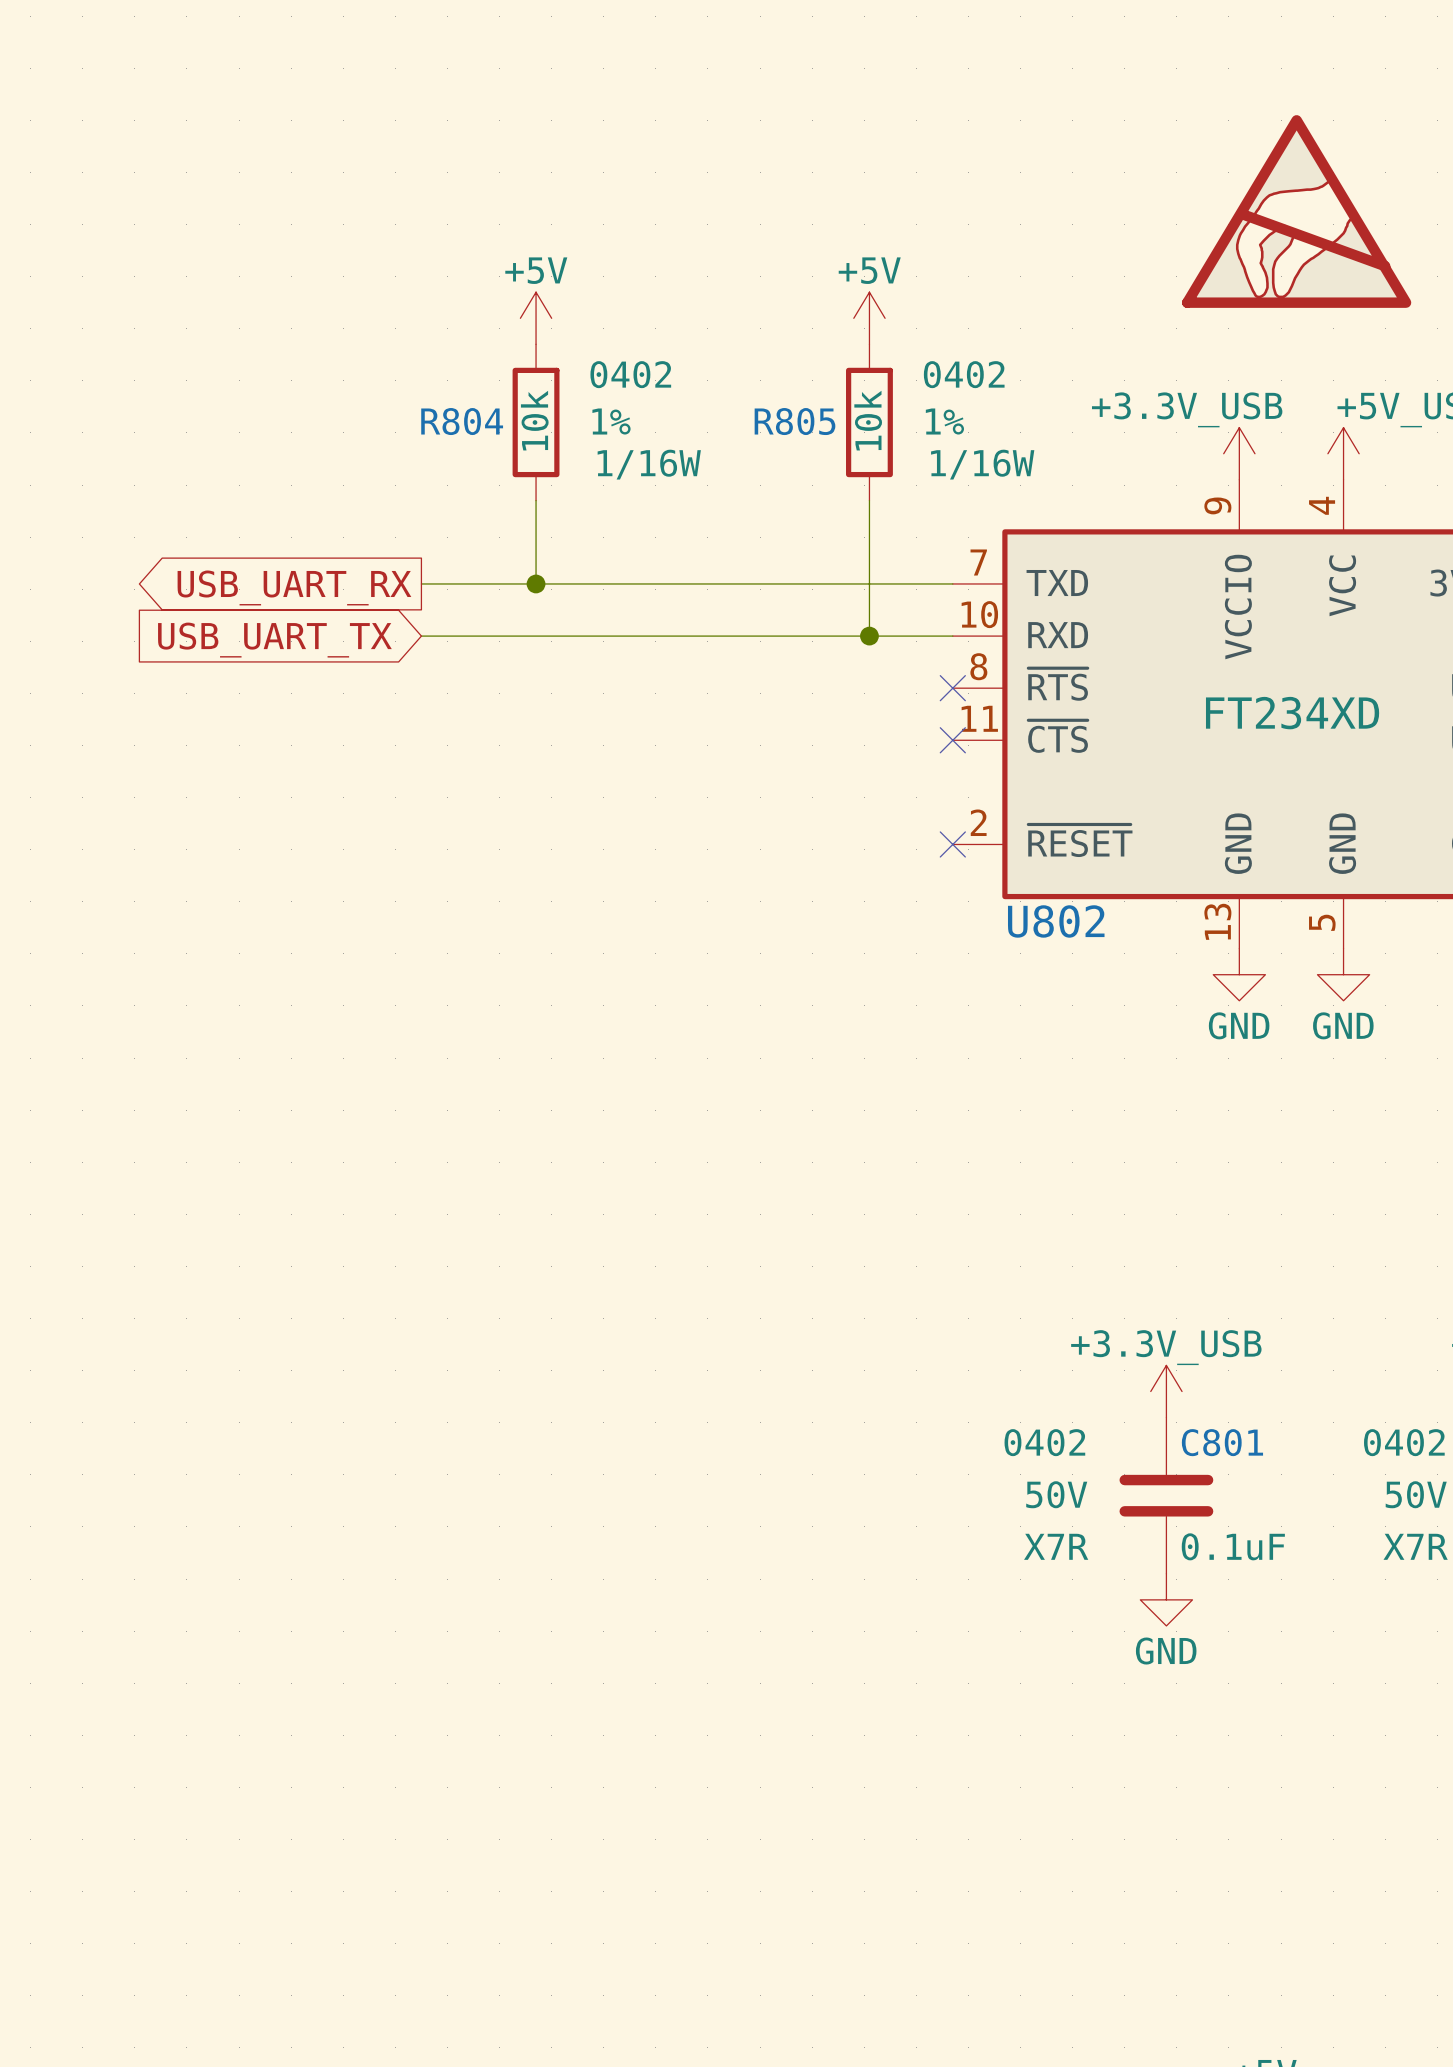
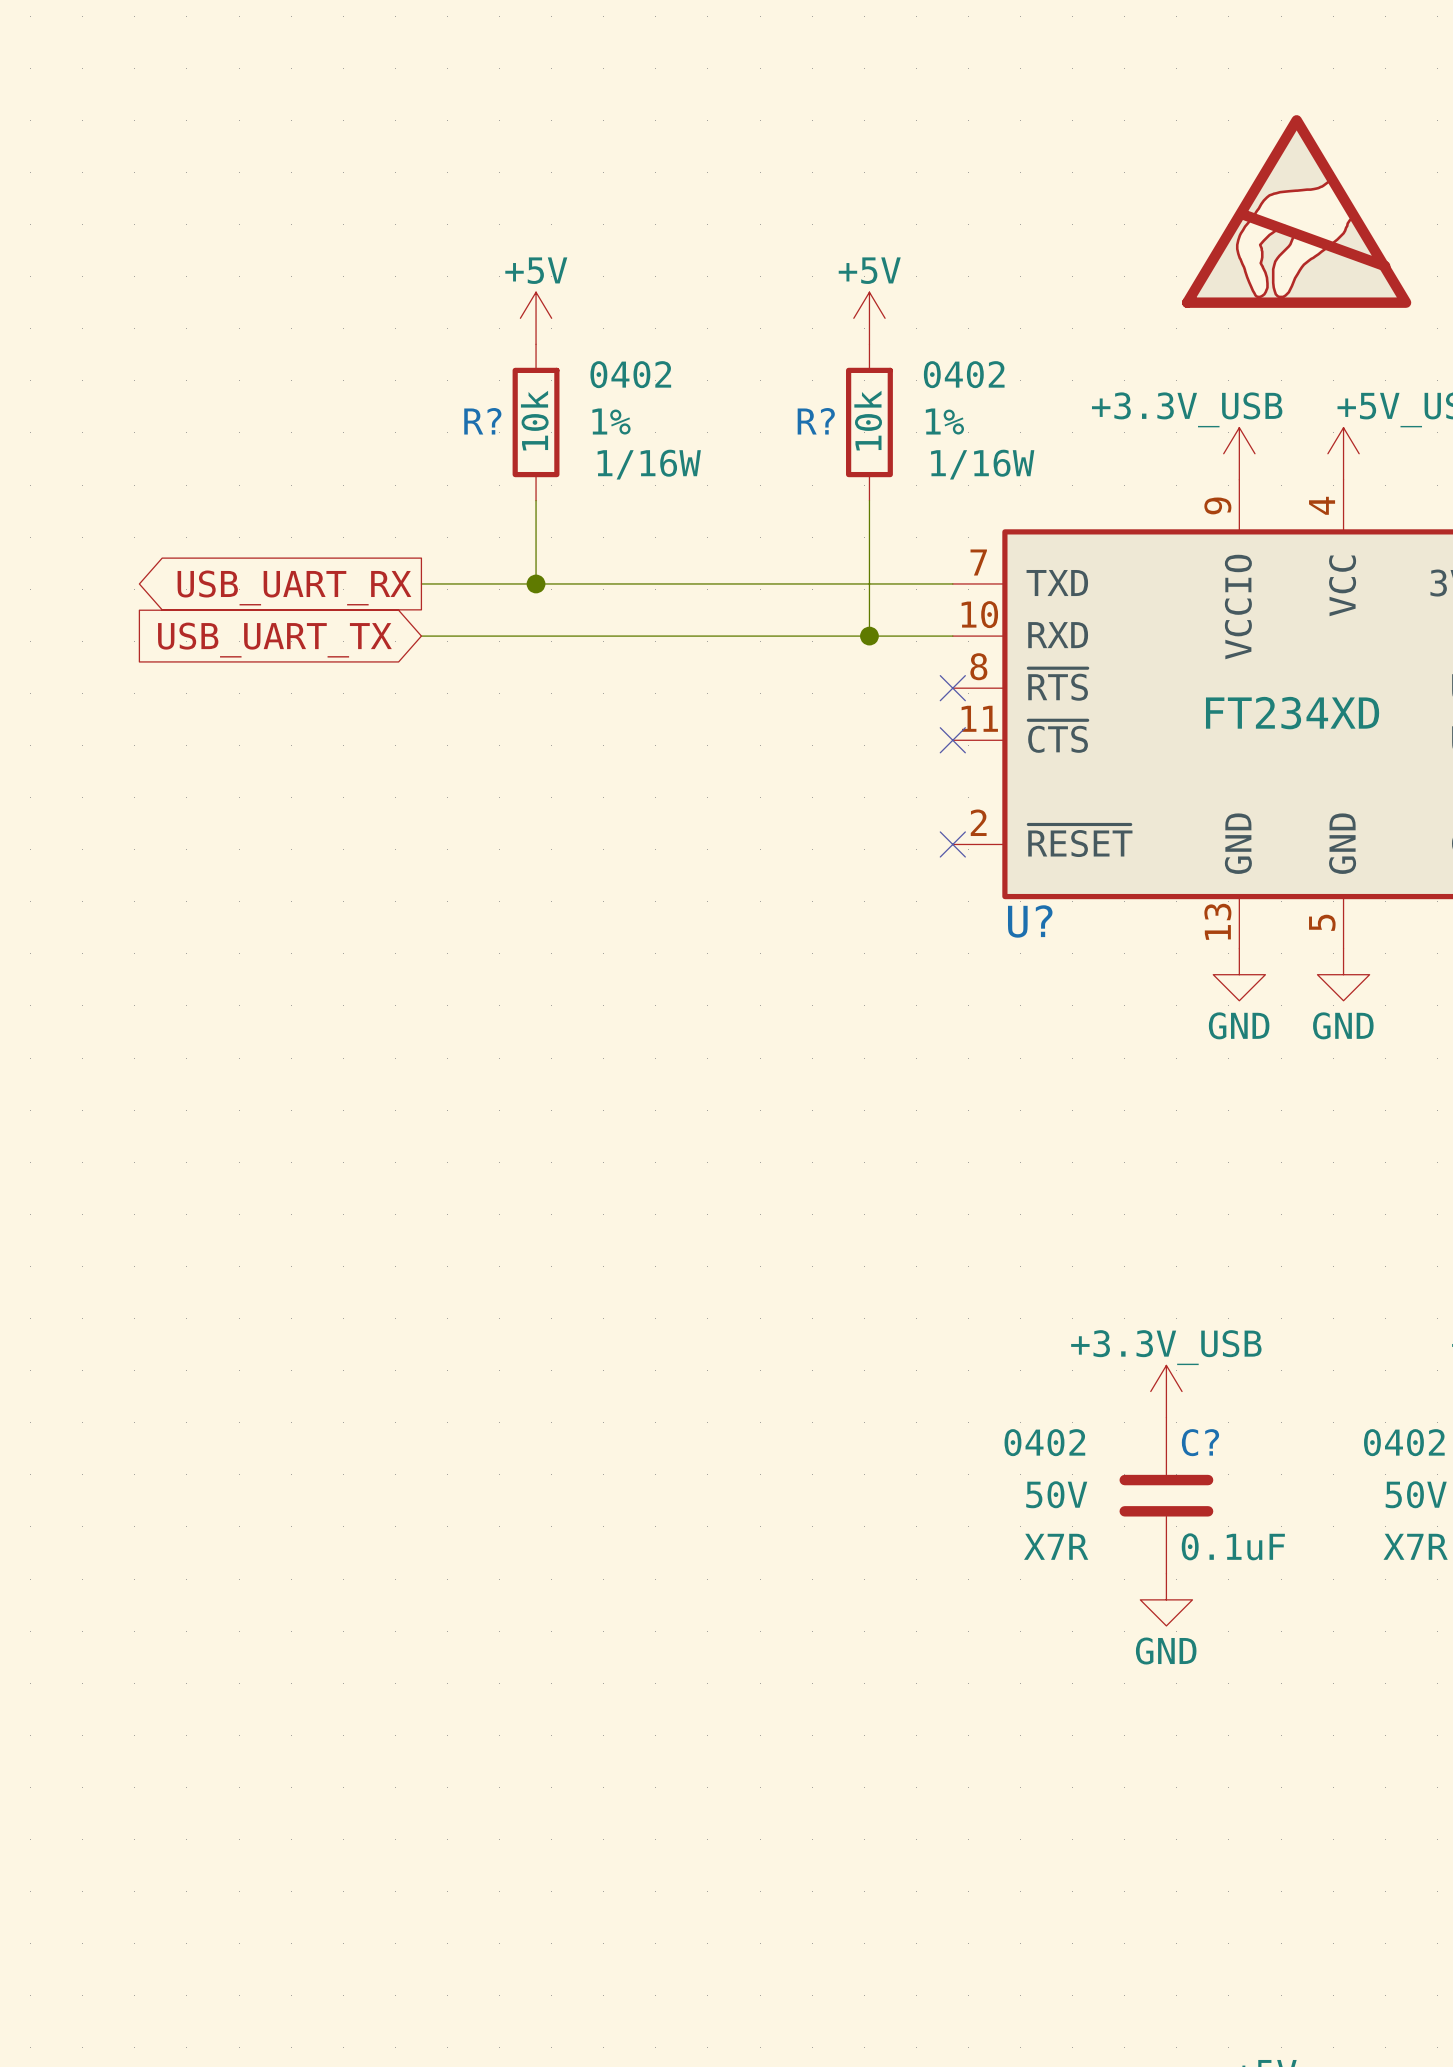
R804 name: R804 (462, 421) -> R? (482, 421)
R805 name: R805 (794, 421) -> R? (816, 421)
U802 name: U802 (1056, 921) -> U? (1030, 921)
C801 name: C801 (1222, 1442) -> C? (1200, 1442)

